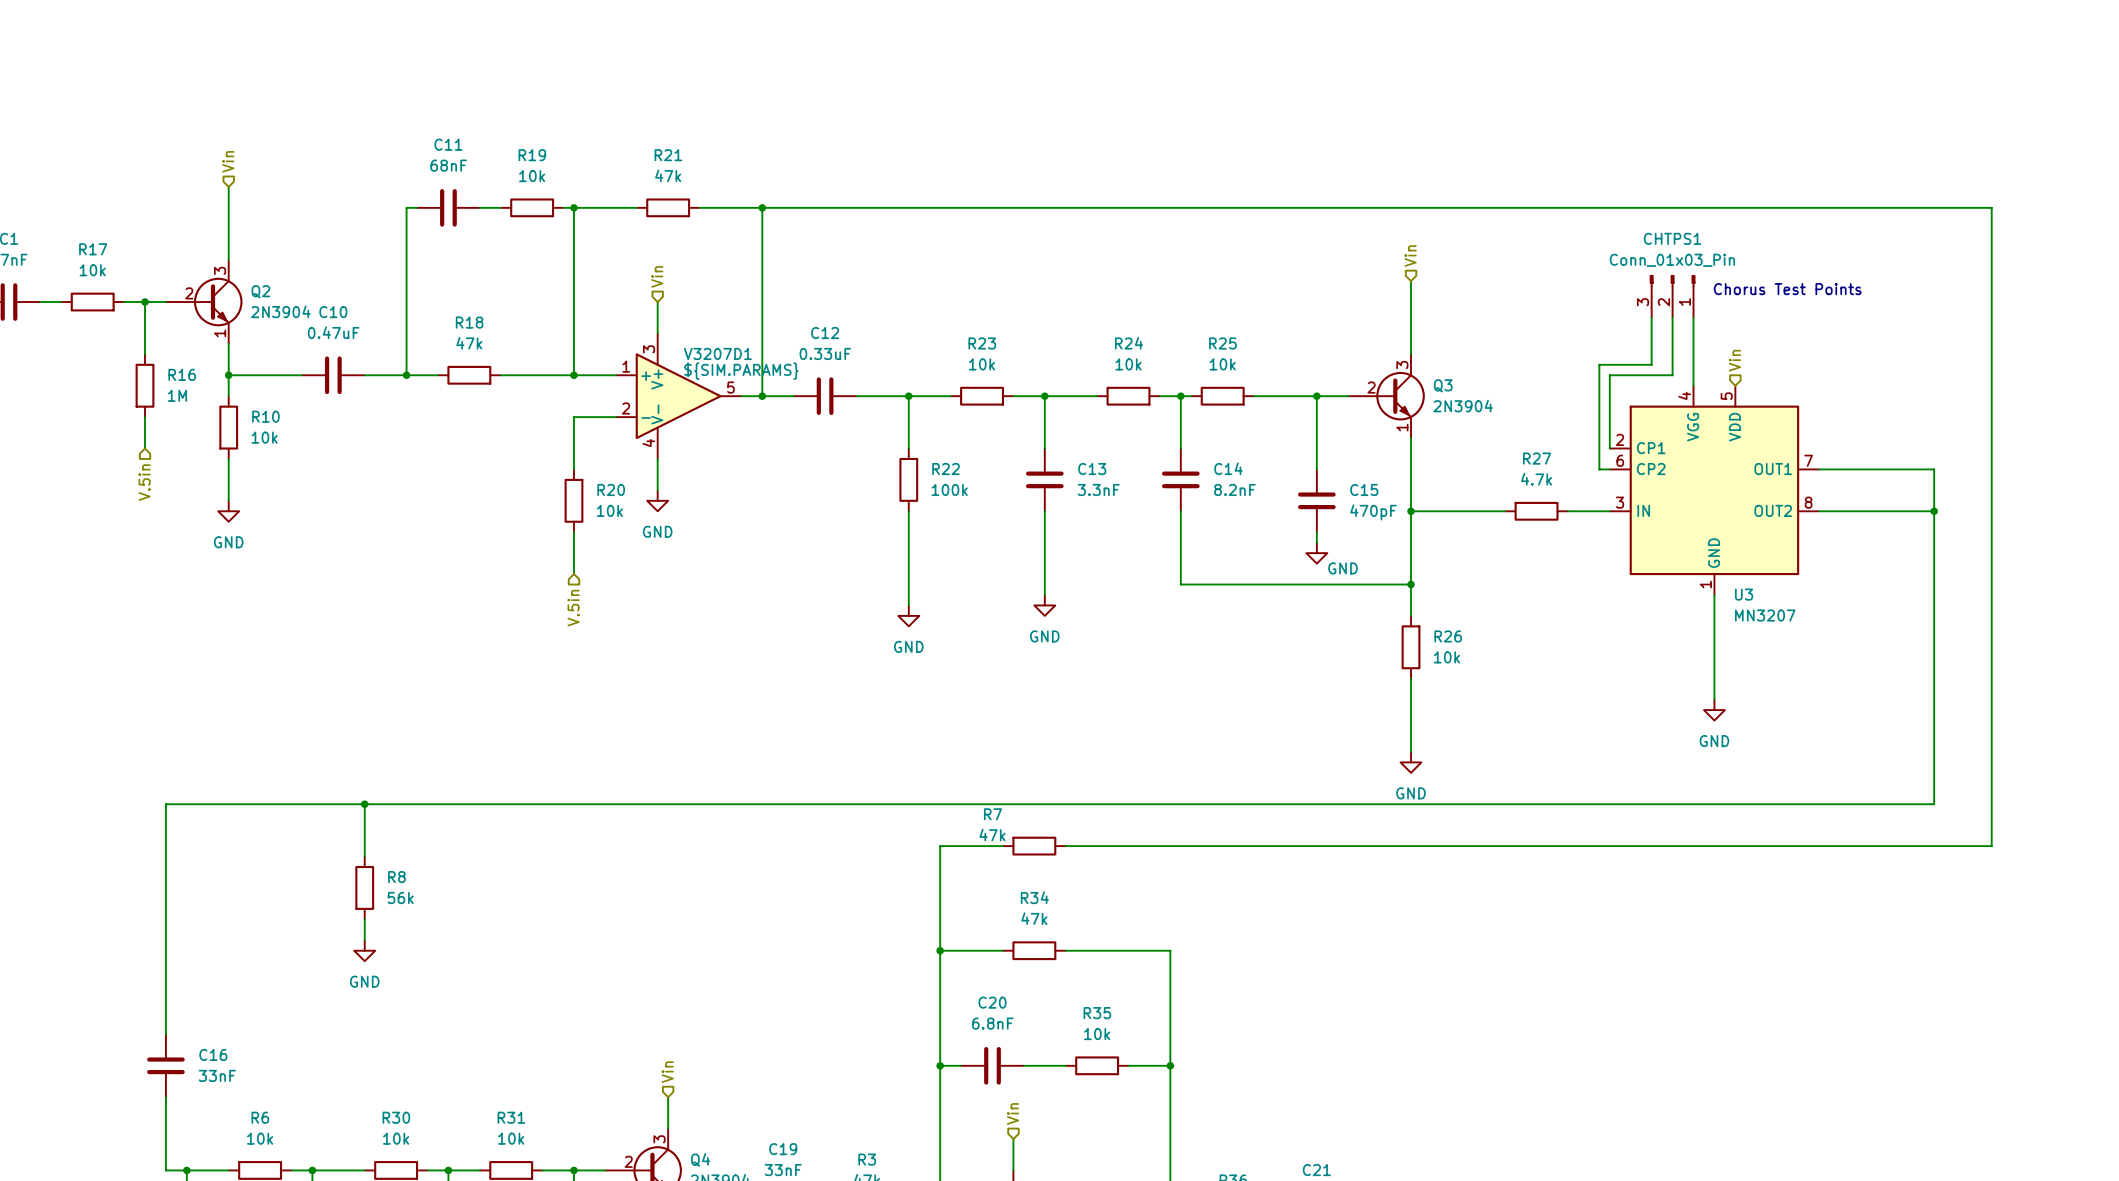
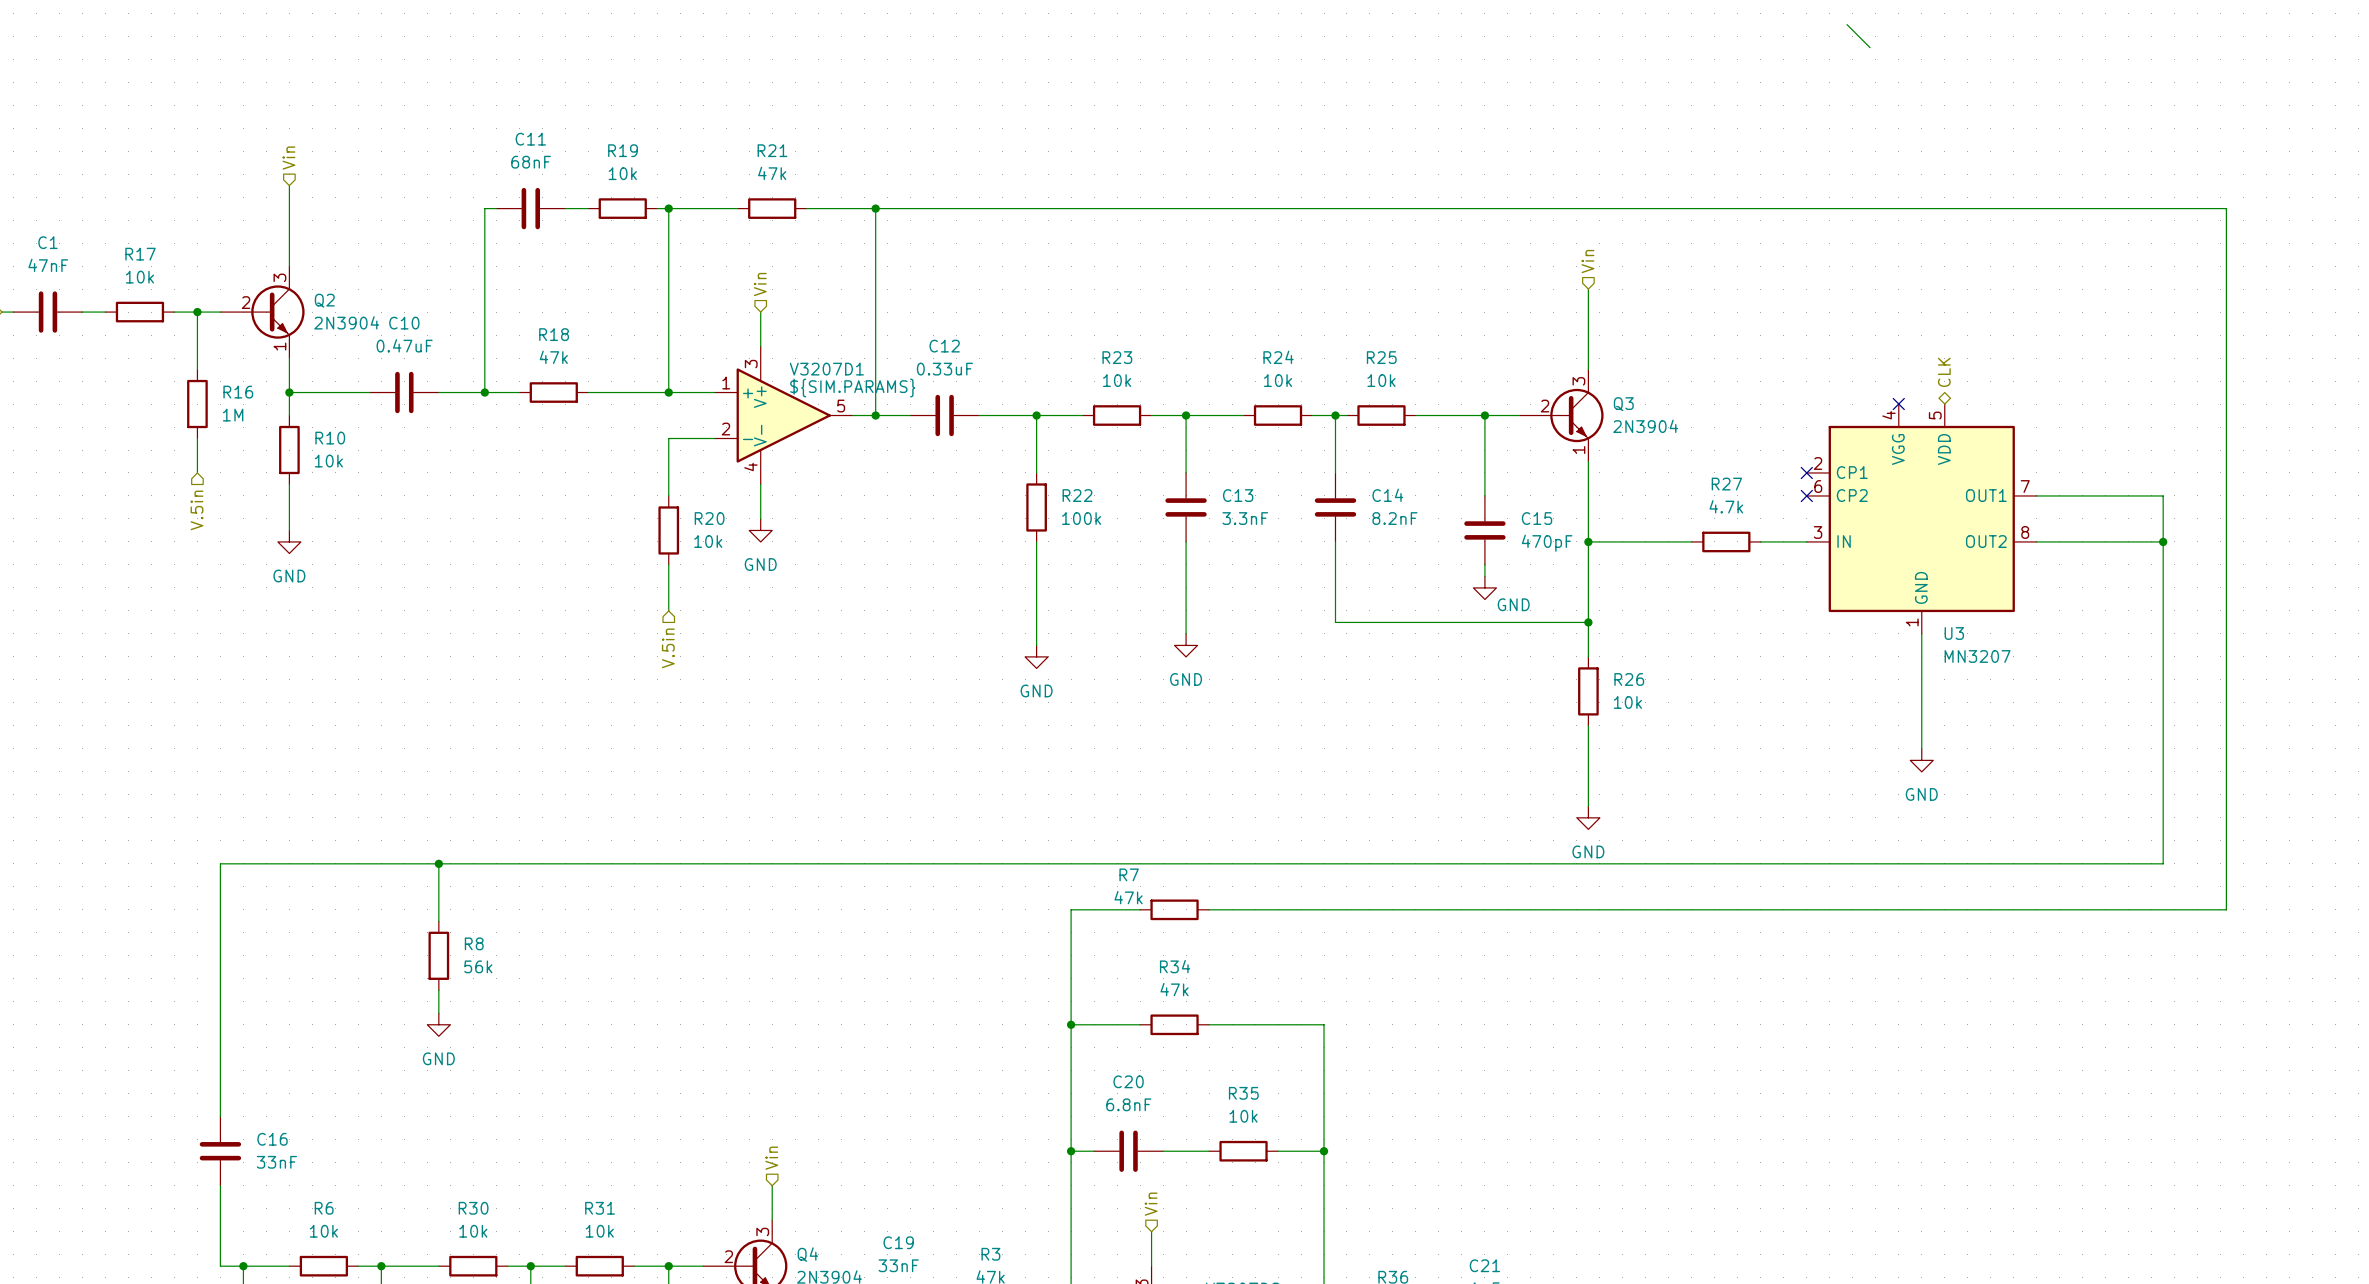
wire: none -> (1847, 24) (1870, 47)
text: Chorus Test Points (1787, 289) -> none
CHTPS1: Conn_01x03_Pin (1672, 296) -> none
wire: (1651, 317) (1651, 364) (1599, 364) (1599, 469) (1609, 469) -> none
wire: (1672, 317) (1672, 375) (1609, 375) (1609, 448) -> none
wire: (1693, 317) (1693, 385) -> none
hierarchical label shape: input (1734, 360) -> bidirectional (1944, 372)
hierarchical label: Vin (1734, 360) -> CLK (1944, 372)
no-connect mark: none -> (1898, 404)
no-connect mark: none -> (1806, 472)
no-connect mark: none -> (1806, 495)

